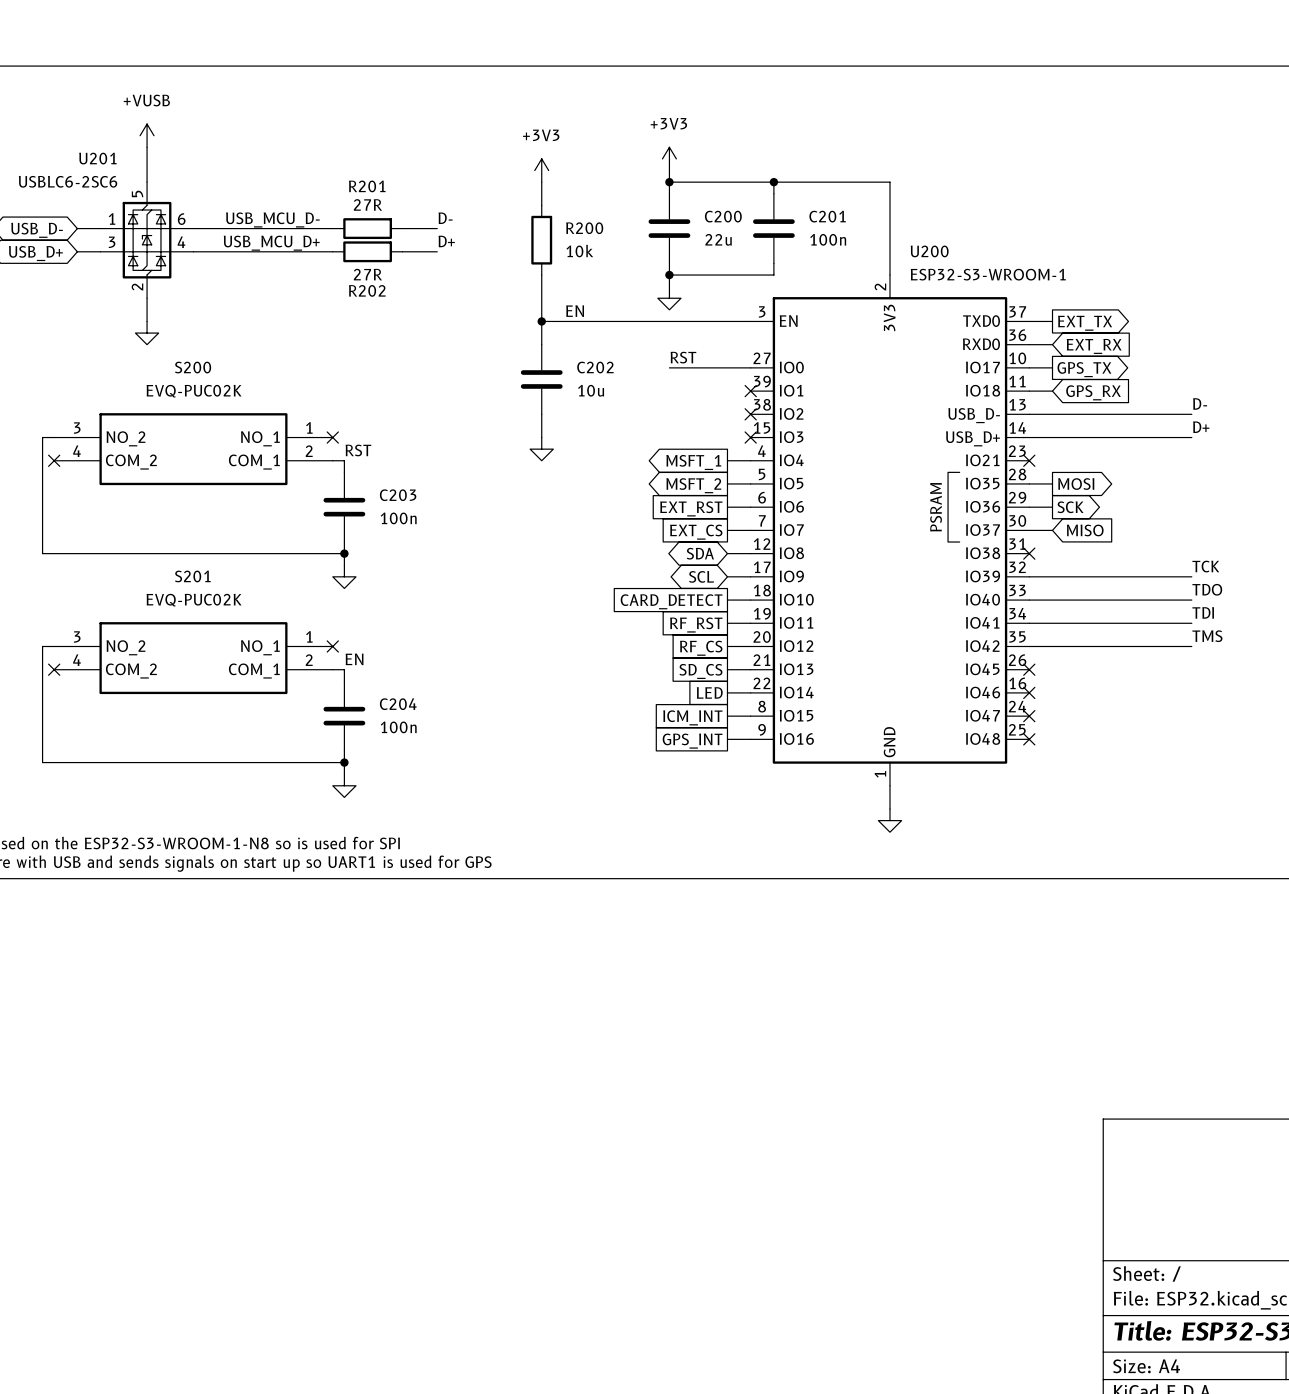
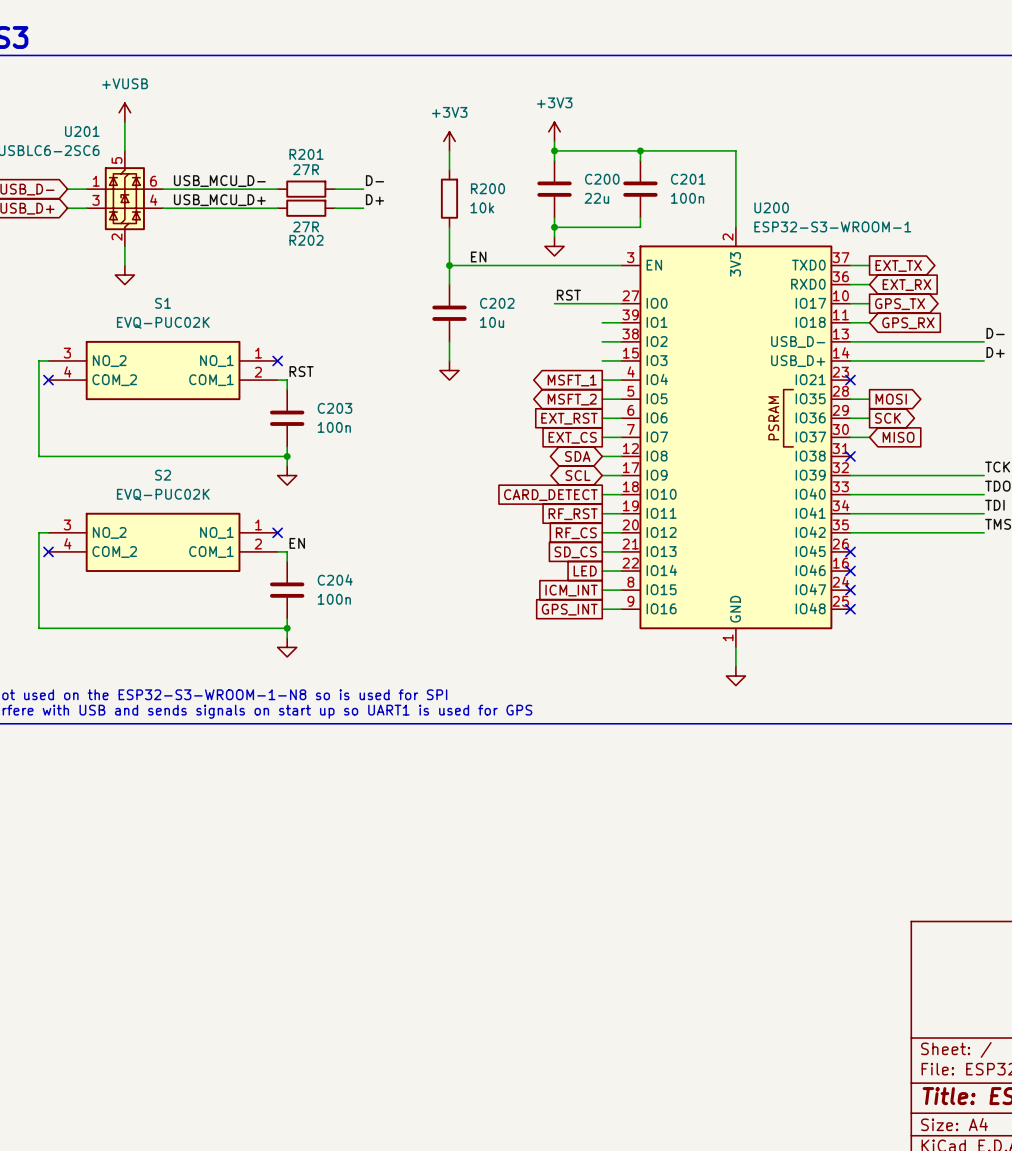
S200 name: S200 (193, 367) -> S1 (163, 303)
wire: none -> (602, 322) (621, 322)
no-connect mark: (750, 391) -> none
wire: none -> (602, 341) (621, 341)
no-connect mark: (750, 414) -> none
wire: none -> (602, 360) (621, 360)
no-connect mark: (750, 437) -> none
S201 name: S201 (192, 576) -> S2 (163, 475)

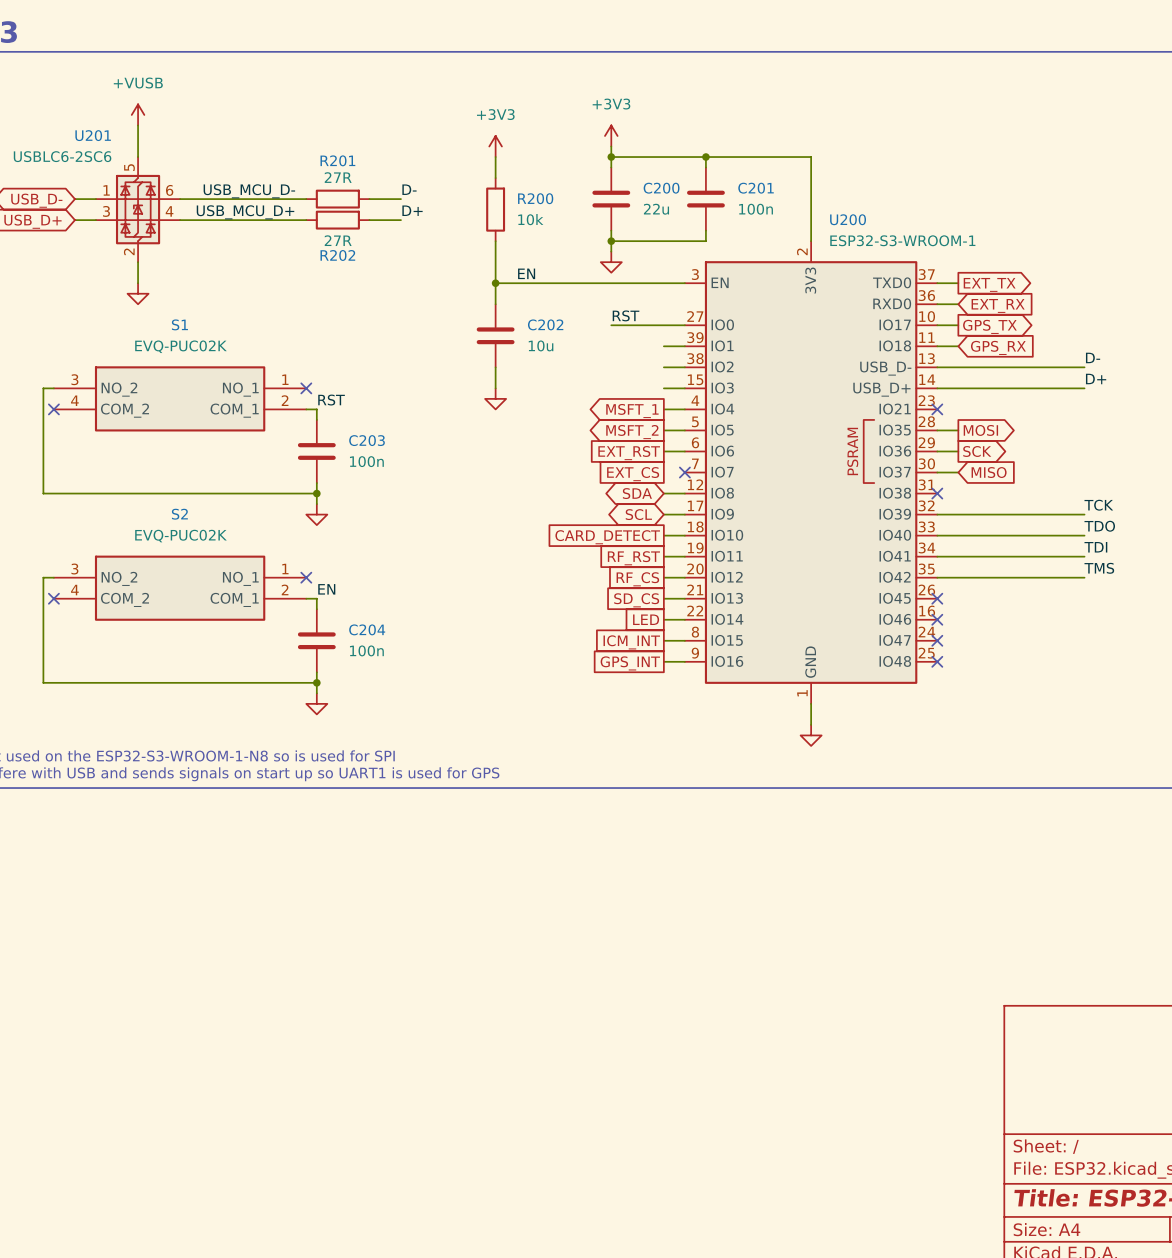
wire: (602, 437) (621, 437) -> none
no-connect mark: none -> (684, 472)

